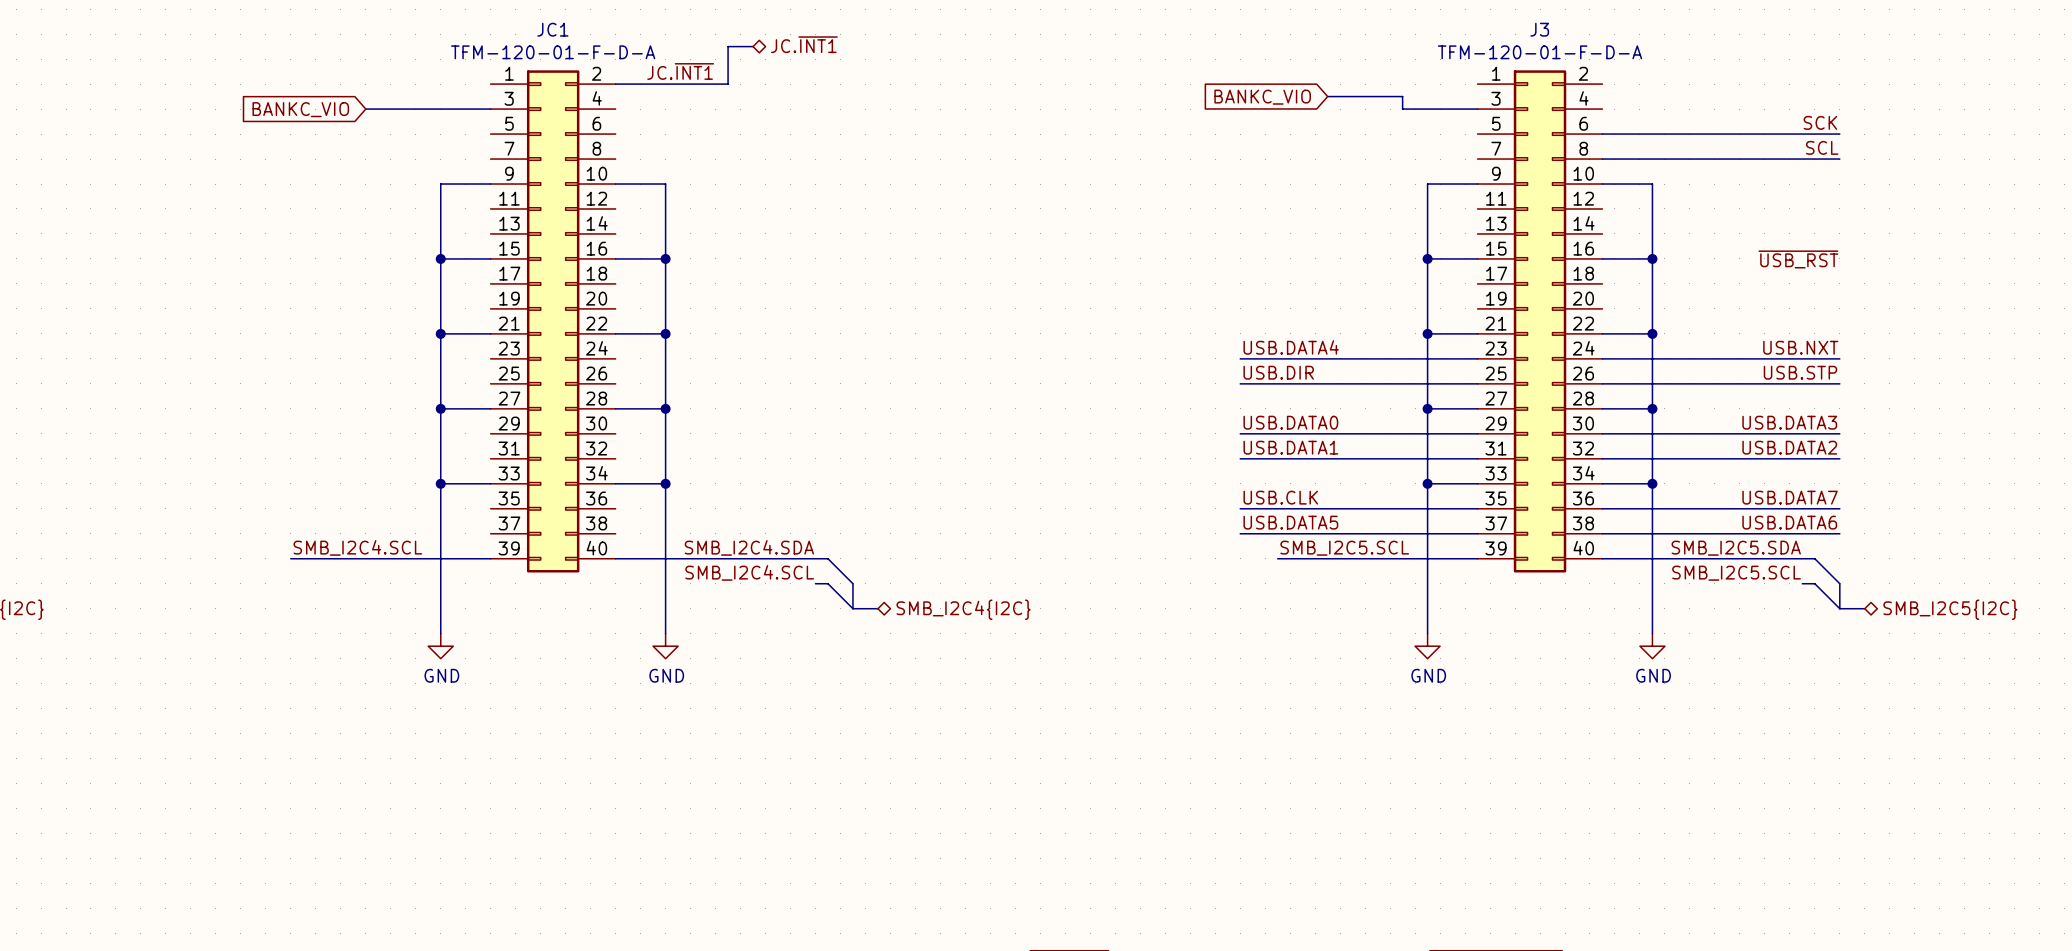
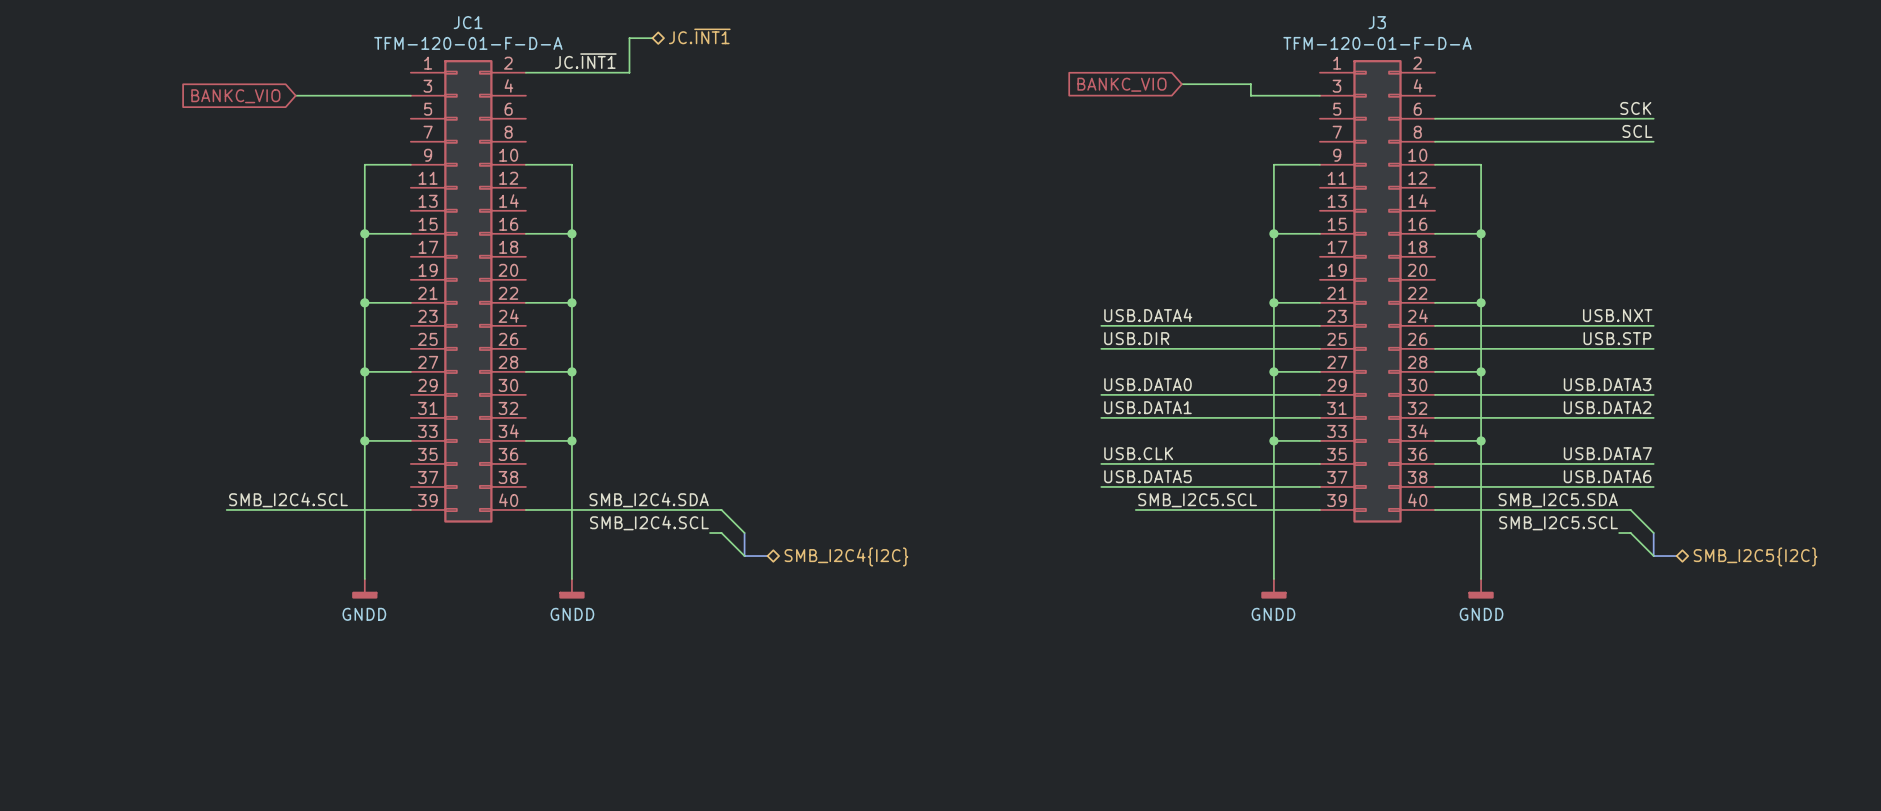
label: ~{USB_RST} (1798, 259) -> none
power symbol: GND (440, 646) -> GNDD (364, 588)
power symbol: GND (665, 646) -> GNDD (571, 588)
power symbol: GND (1427, 646) -> GNDD (1273, 588)
power symbol: GND (1652, 646) -> GNDD (1481, 588)

